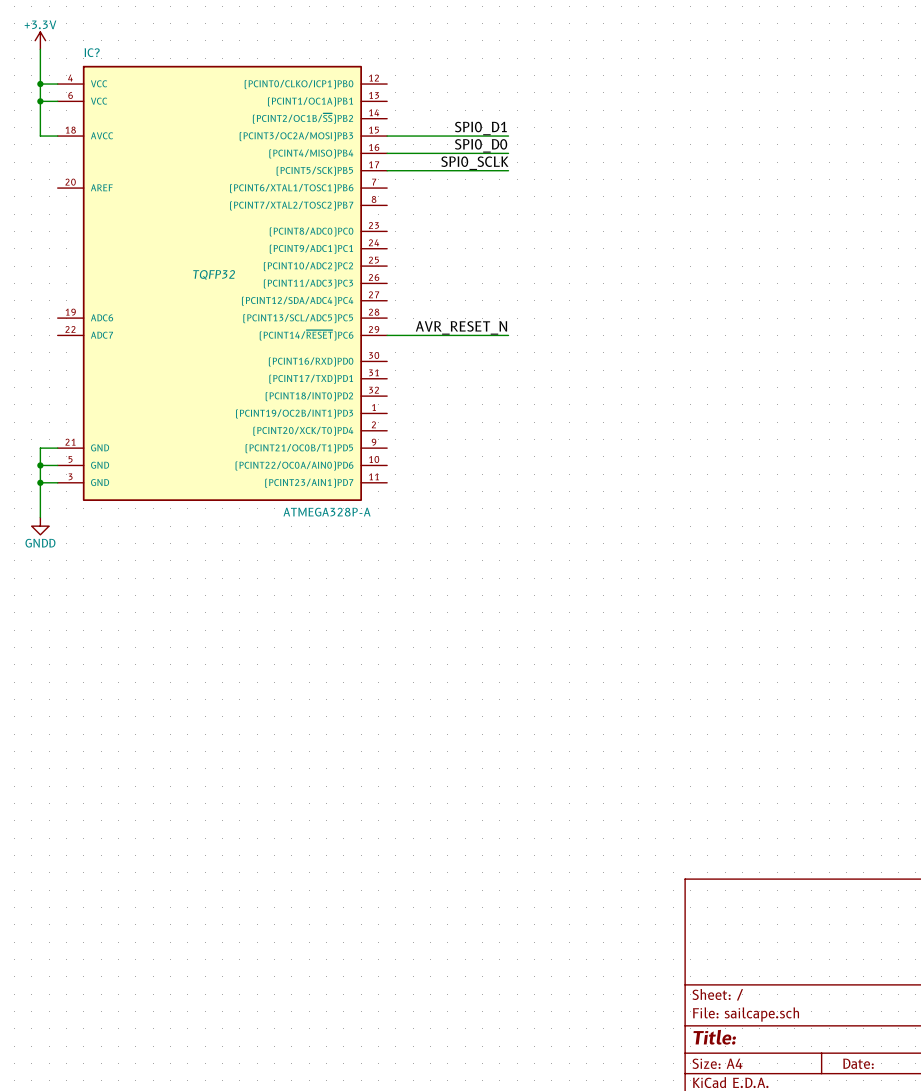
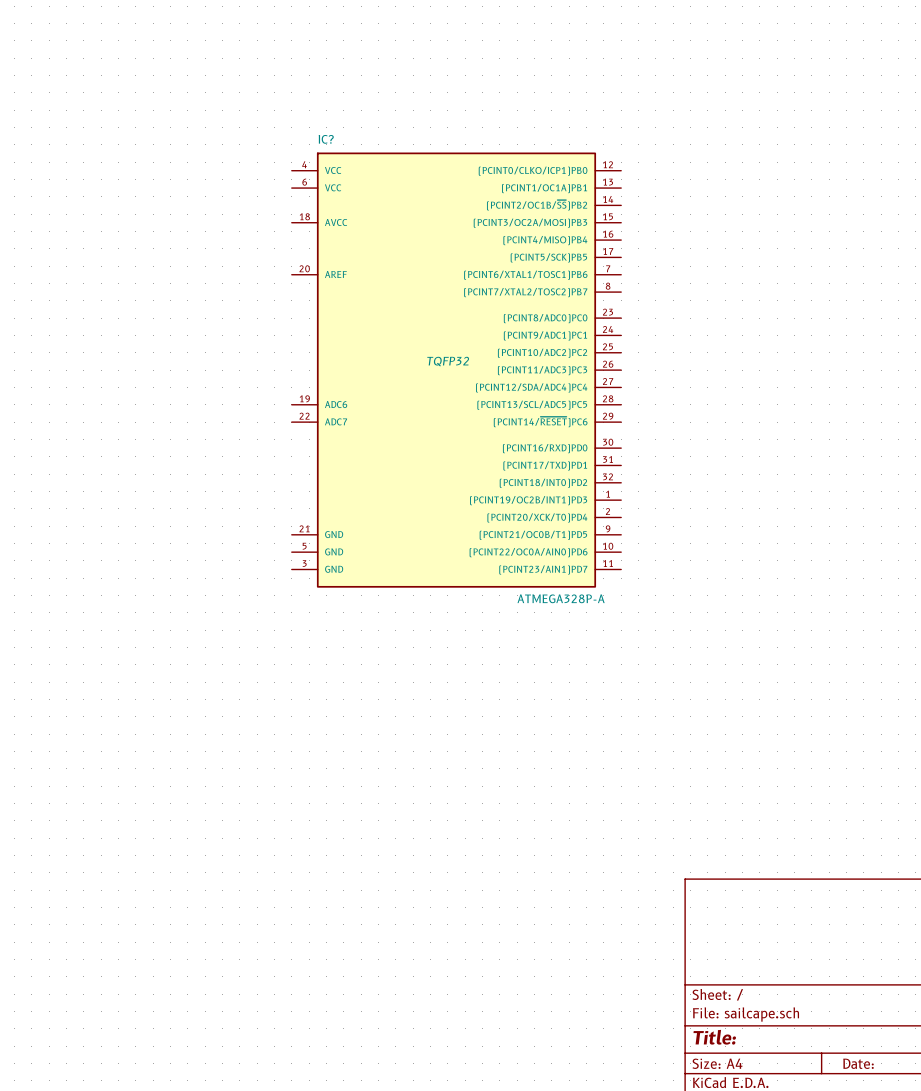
power symbol: +3.3V (40, 40) -> none
wire: (40, 49) (40, 136) (57, 136) -> none
wire: (40, 84) (57, 84) -> none
junction: (40, 84) -> none
wire: (40, 101) (57, 101) -> none
junction: (40, 101) -> none
label: SPI0_D1 (480, 128) -> none
wire: (387, 136) (508, 136) -> none
label: SPI0_D0 (481, 145) -> none
label: SPI0_SCLK (474, 163) -> none
IC?: ATMEGA328P-A (222, 283) -> none
label: AVR_RESET_N (461, 327) -> none
IC?: none -> ATMEGA328P-A (456, 370)
wire: (57, 448) (40, 448) (40, 517) -> none
wire: (40, 465) (57, 465) -> none
junction: (40, 465) -> none
wire: (40, 482) (57, 482) -> none
junction: (40, 482) -> none
power symbol: GNDD (40, 526) -> none

